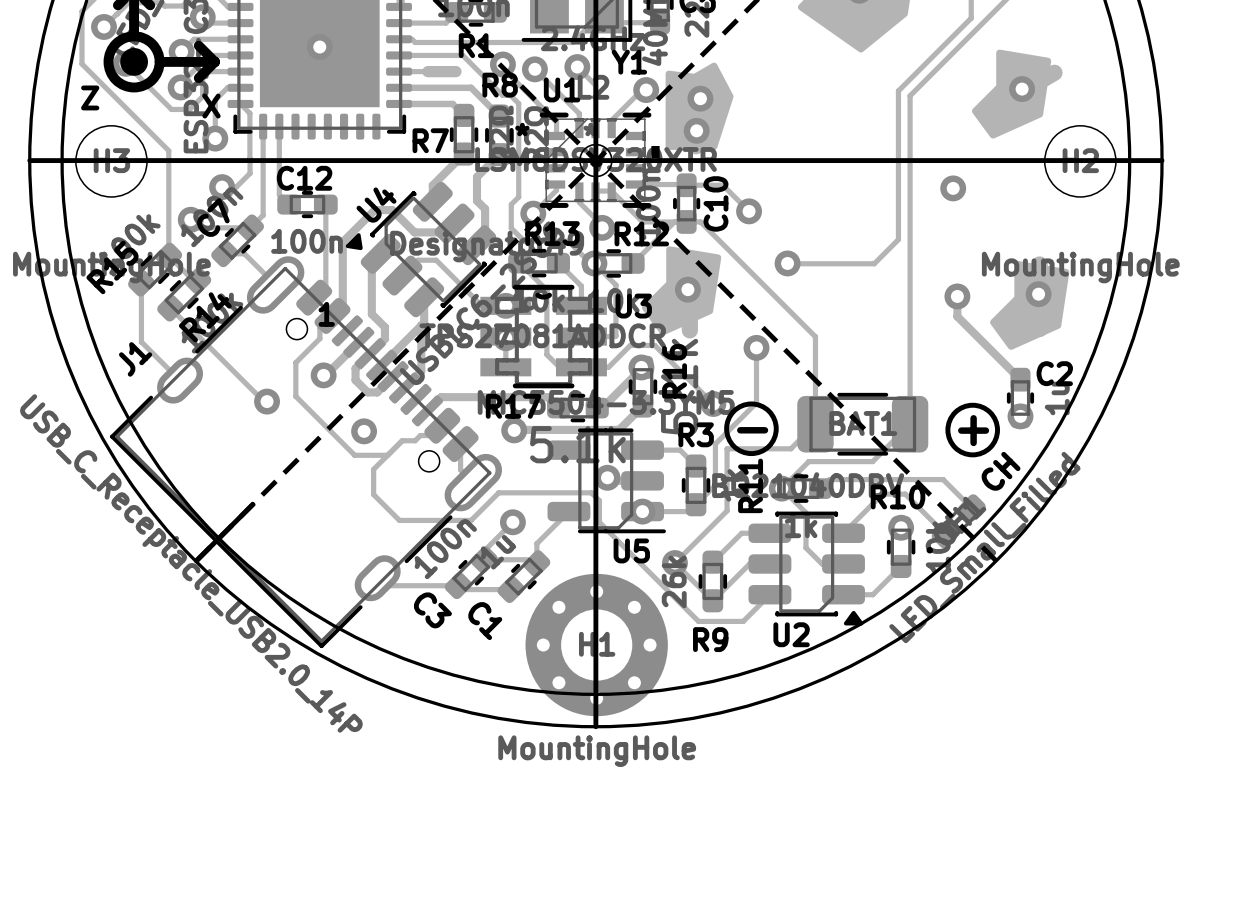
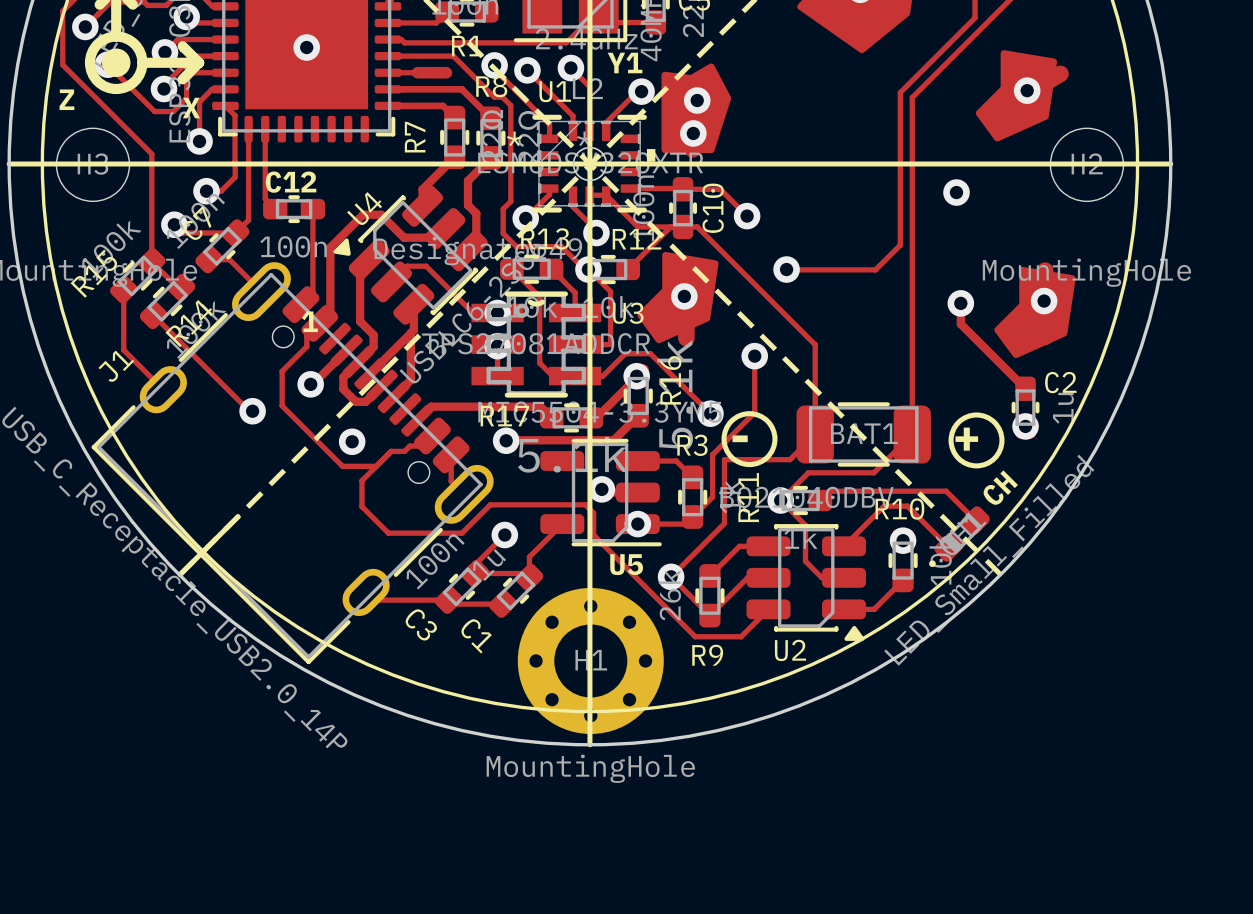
R7 name rotation: 0° (430, 140) -> 90° counterclockwise (415, 137)

